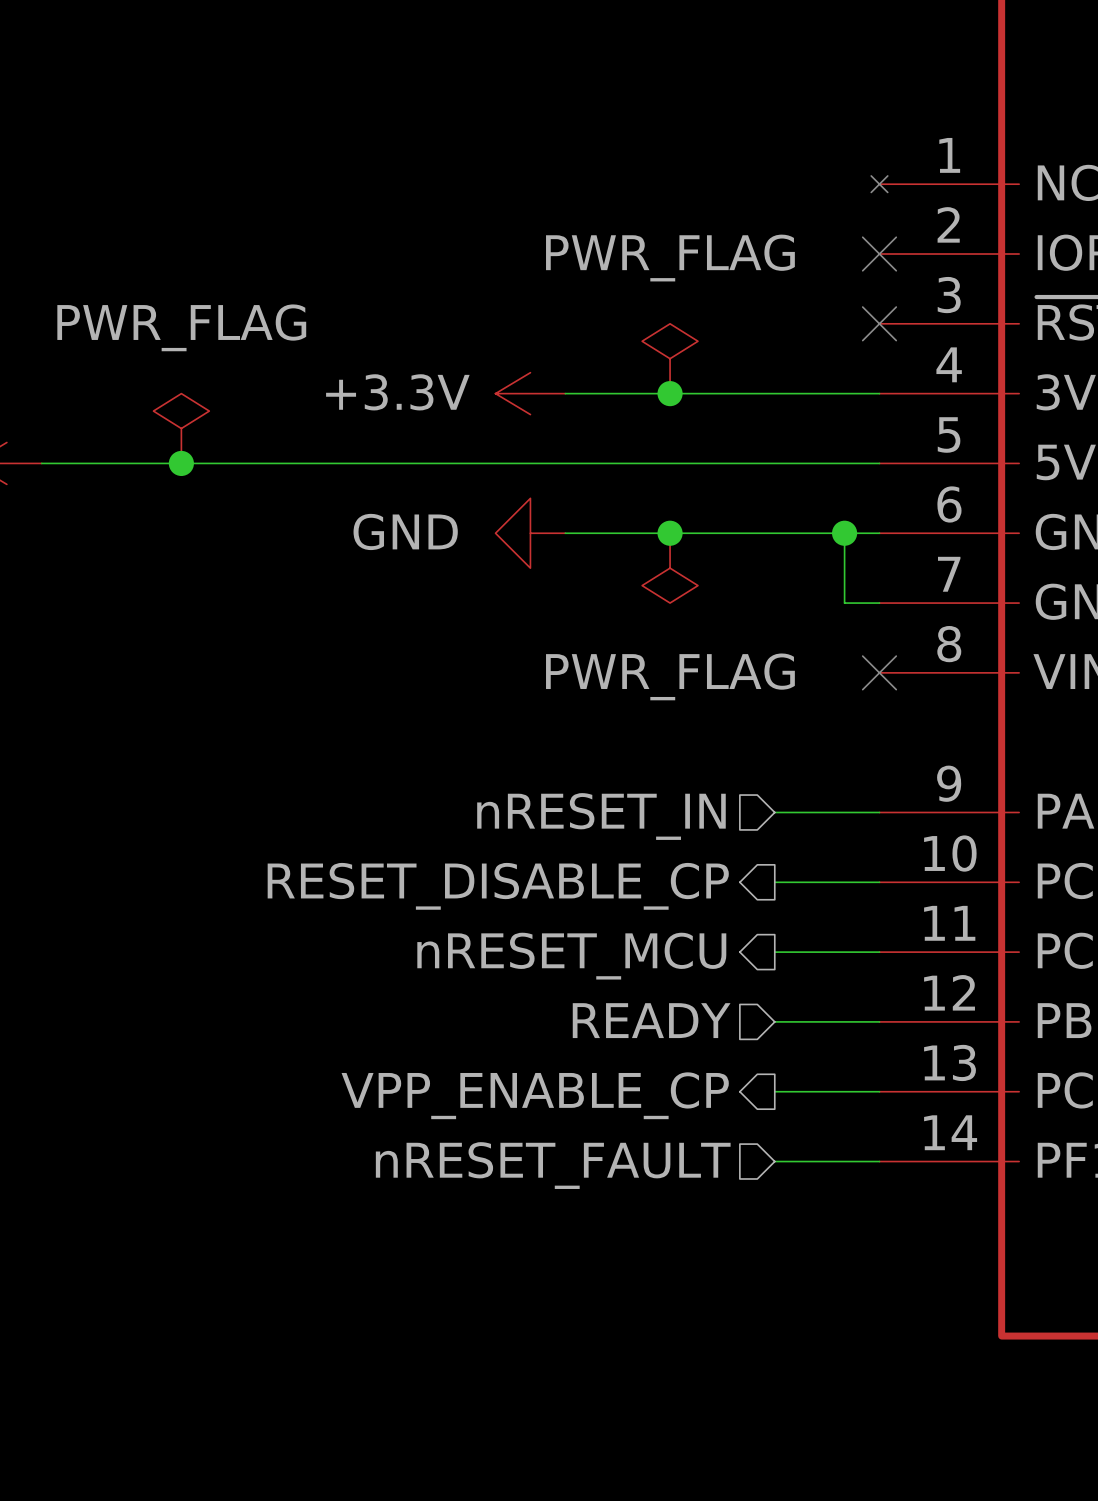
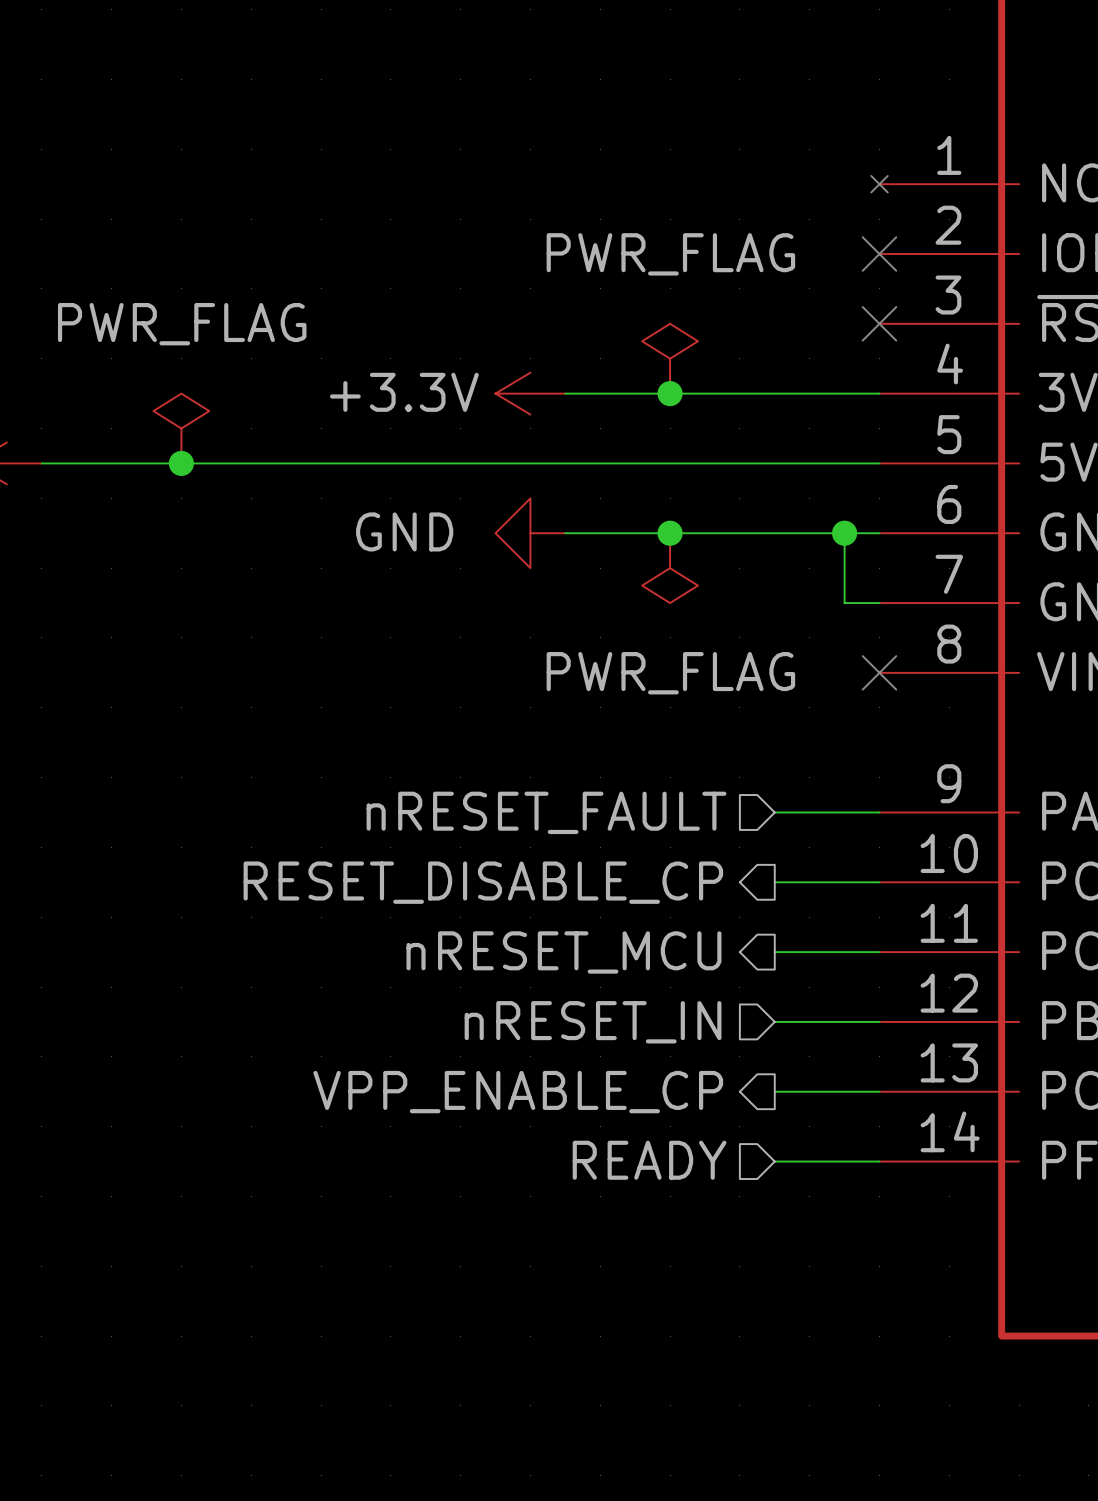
hierarchical label: nRESET_IN (601, 816) -> nRESET_FAULT (546, 812)
hierarchical label: READY (651, 1020) -> nRESET_IN (593, 1022)
hierarchical label: nRESET_FAULT (553, 1165) -> READY (649, 1160)

